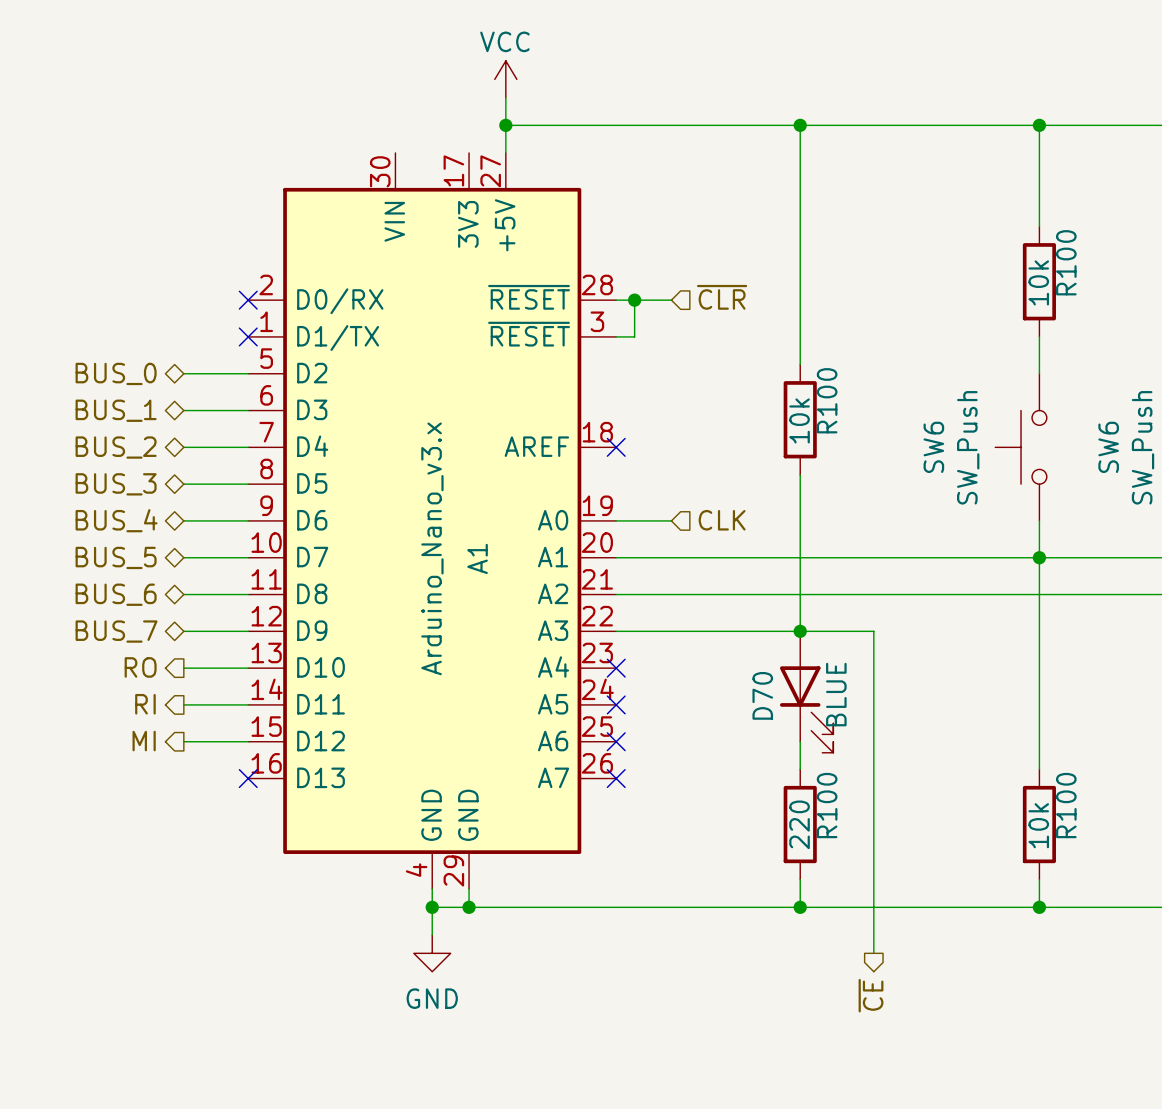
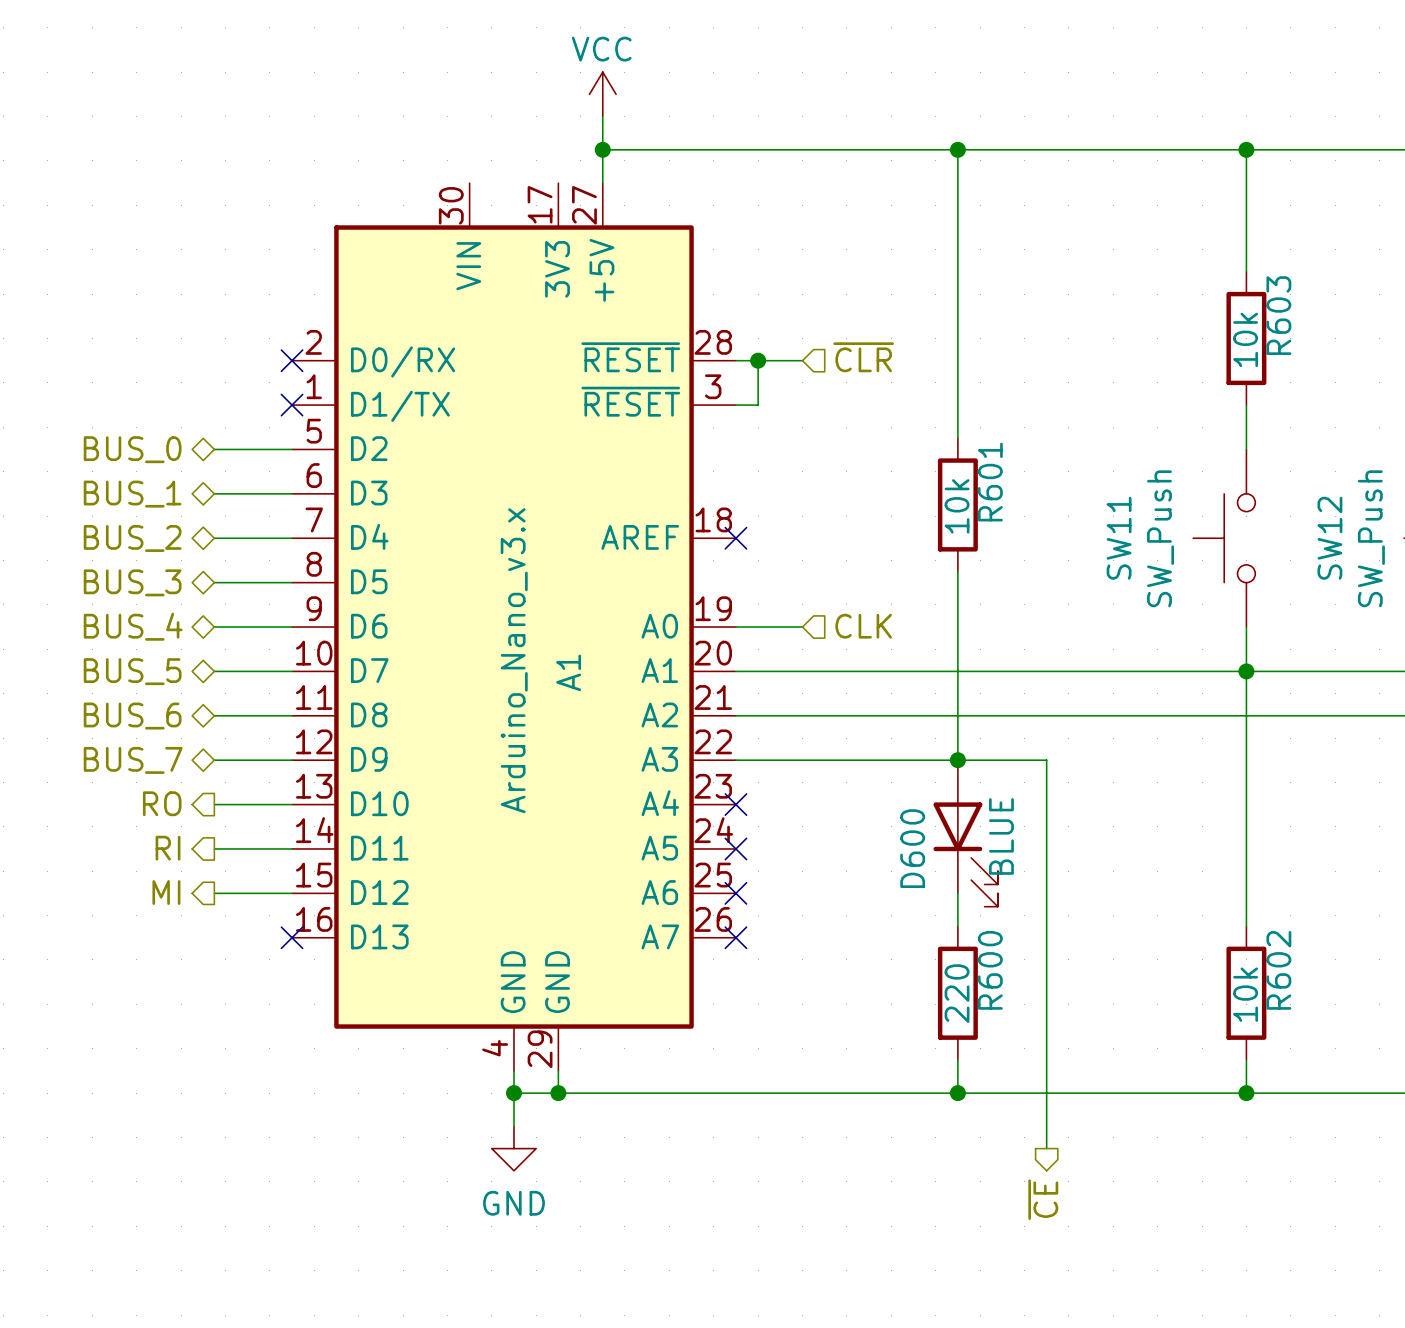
R100 name: R100 (1066, 262) -> R603 (1278, 315)
R100 name: R100 (827, 400) -> R601 (990, 482)
SW6 name: SW6 (933, 447) -> SW11 (1119, 538)
SW6 name: SW6 (1108, 447) -> SW12 (1329, 538)
D70 name: D70 (762, 695) -> D600 (912, 848)
R100 name: R100 (827, 805) -> R600 (990, 970)
R100 name: R100 (1066, 805) -> R602 (1278, 970)

